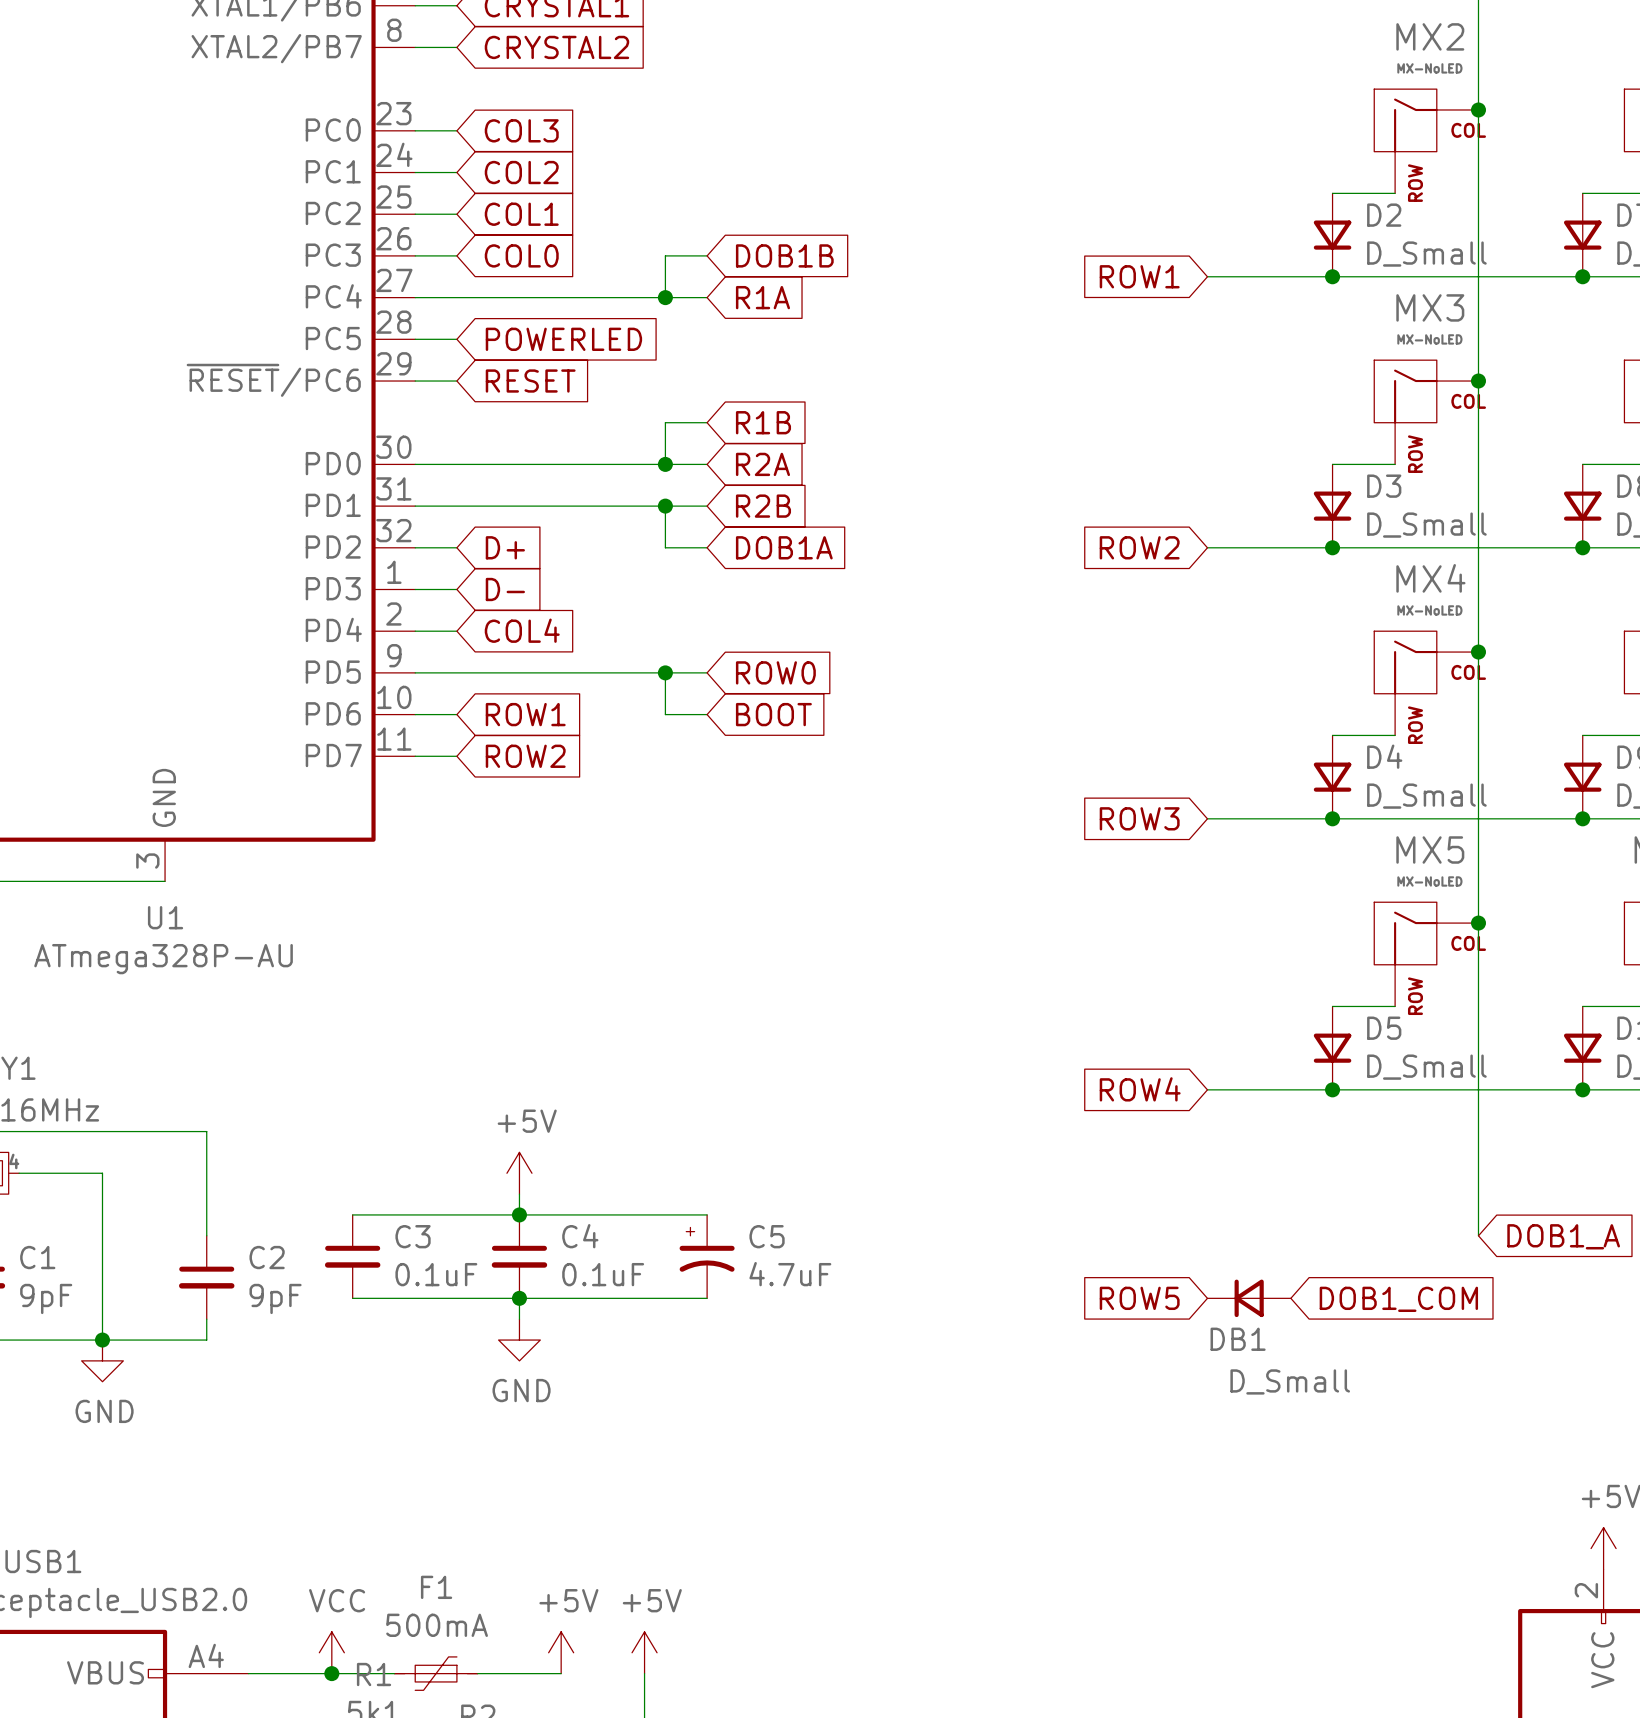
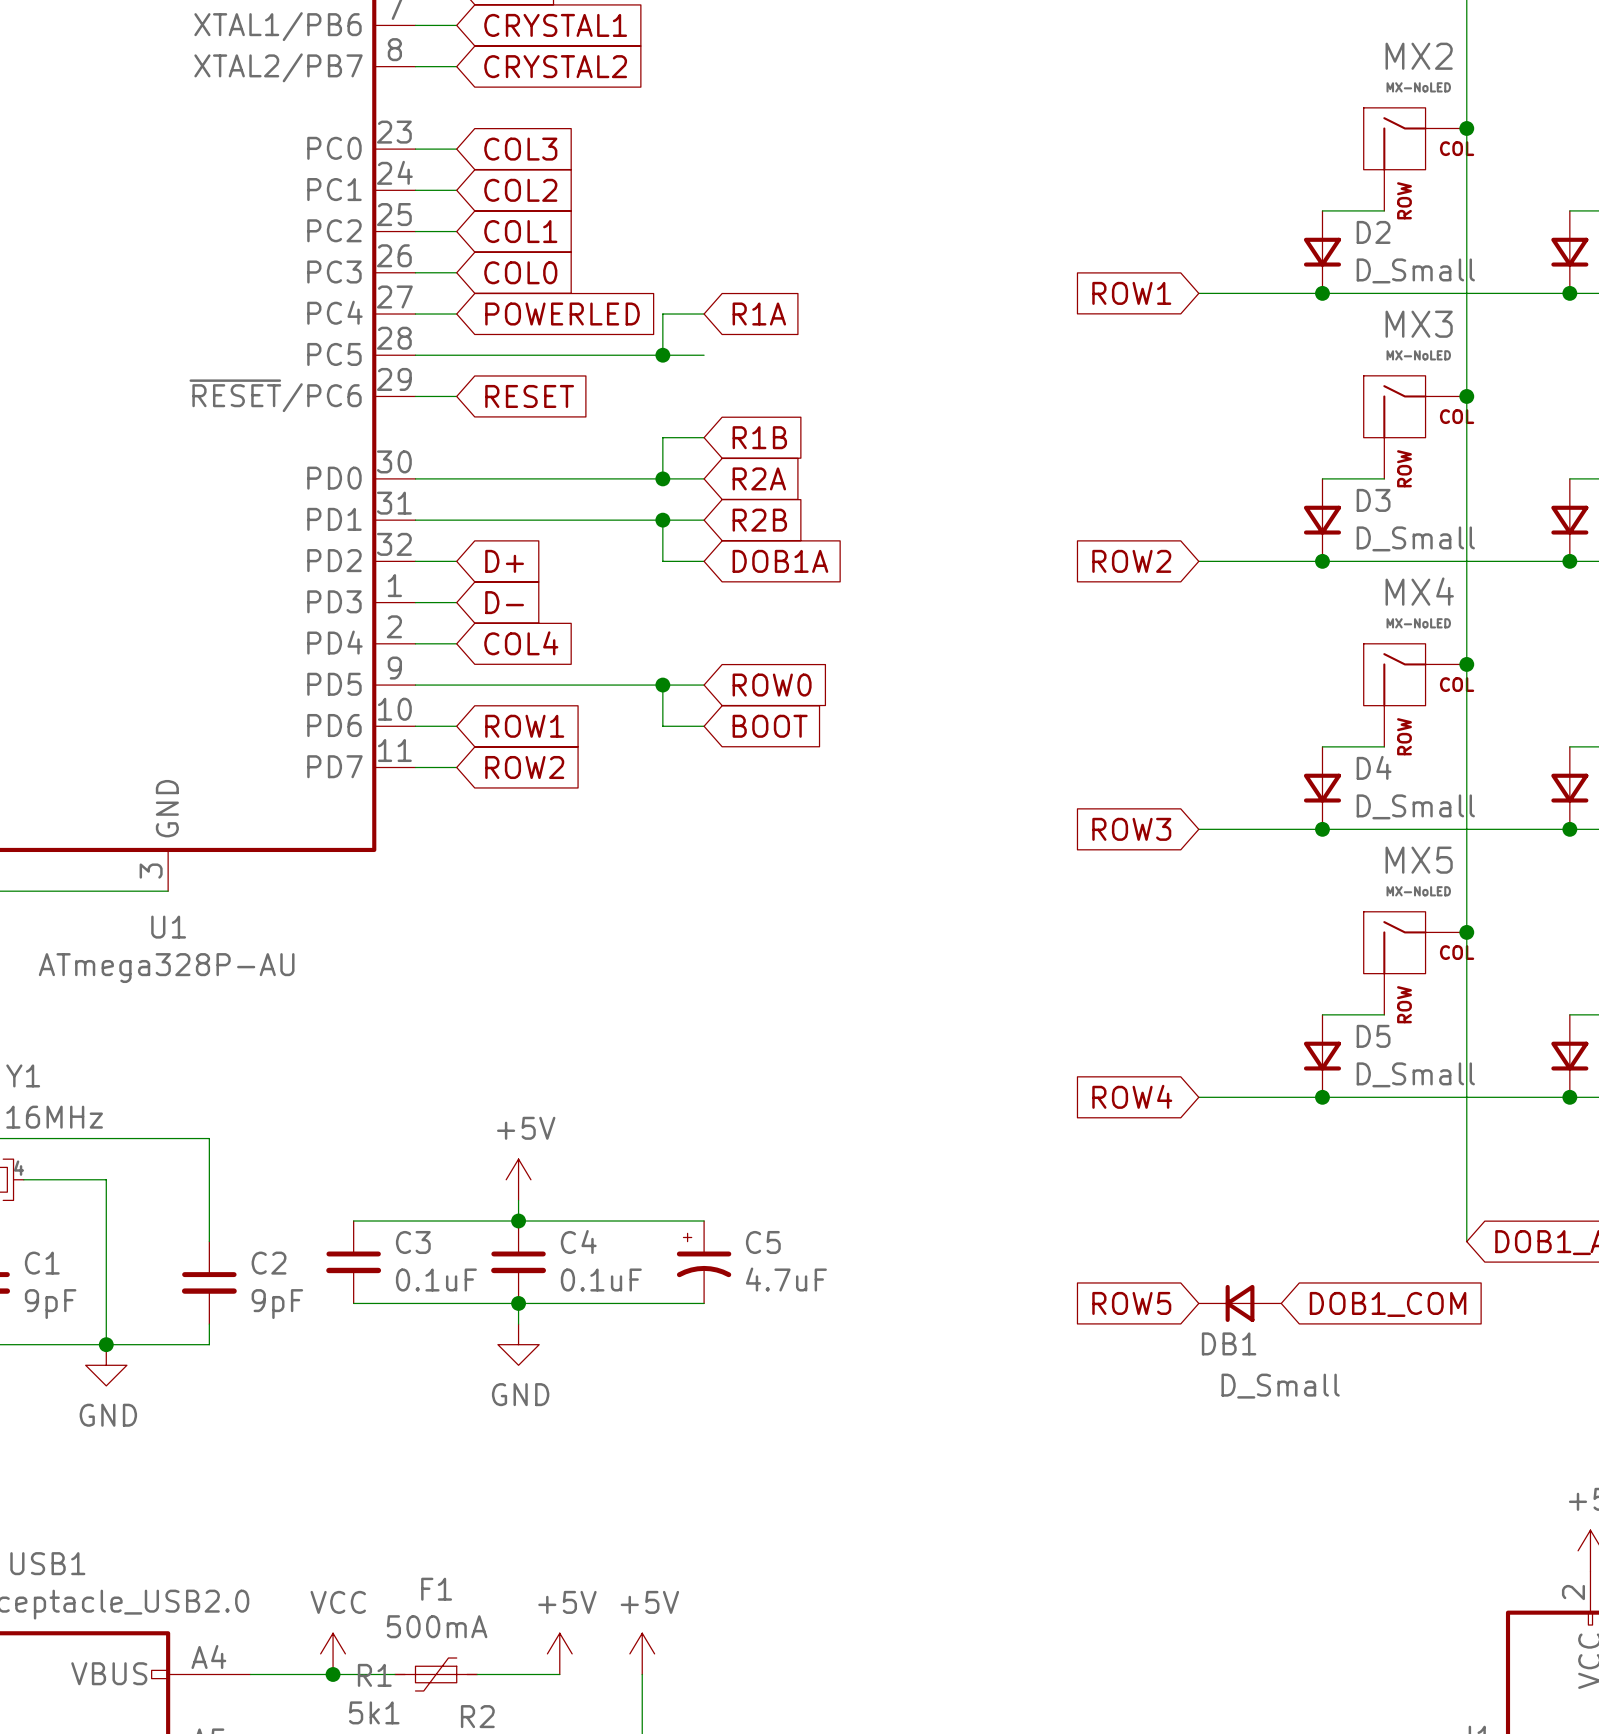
wire: (707, 255) (665, 255) (665, 297) (456, 297) -> none
global label: DOB1B (784, 255) -> none
wire: none -> (662, 314) (662, 355)
junction position: (665, 297) -> (662, 355)
wire: none -> (456, 355) (704, 355)
global label position: POWERLED (563, 339) -> POWERLED (562, 314)

